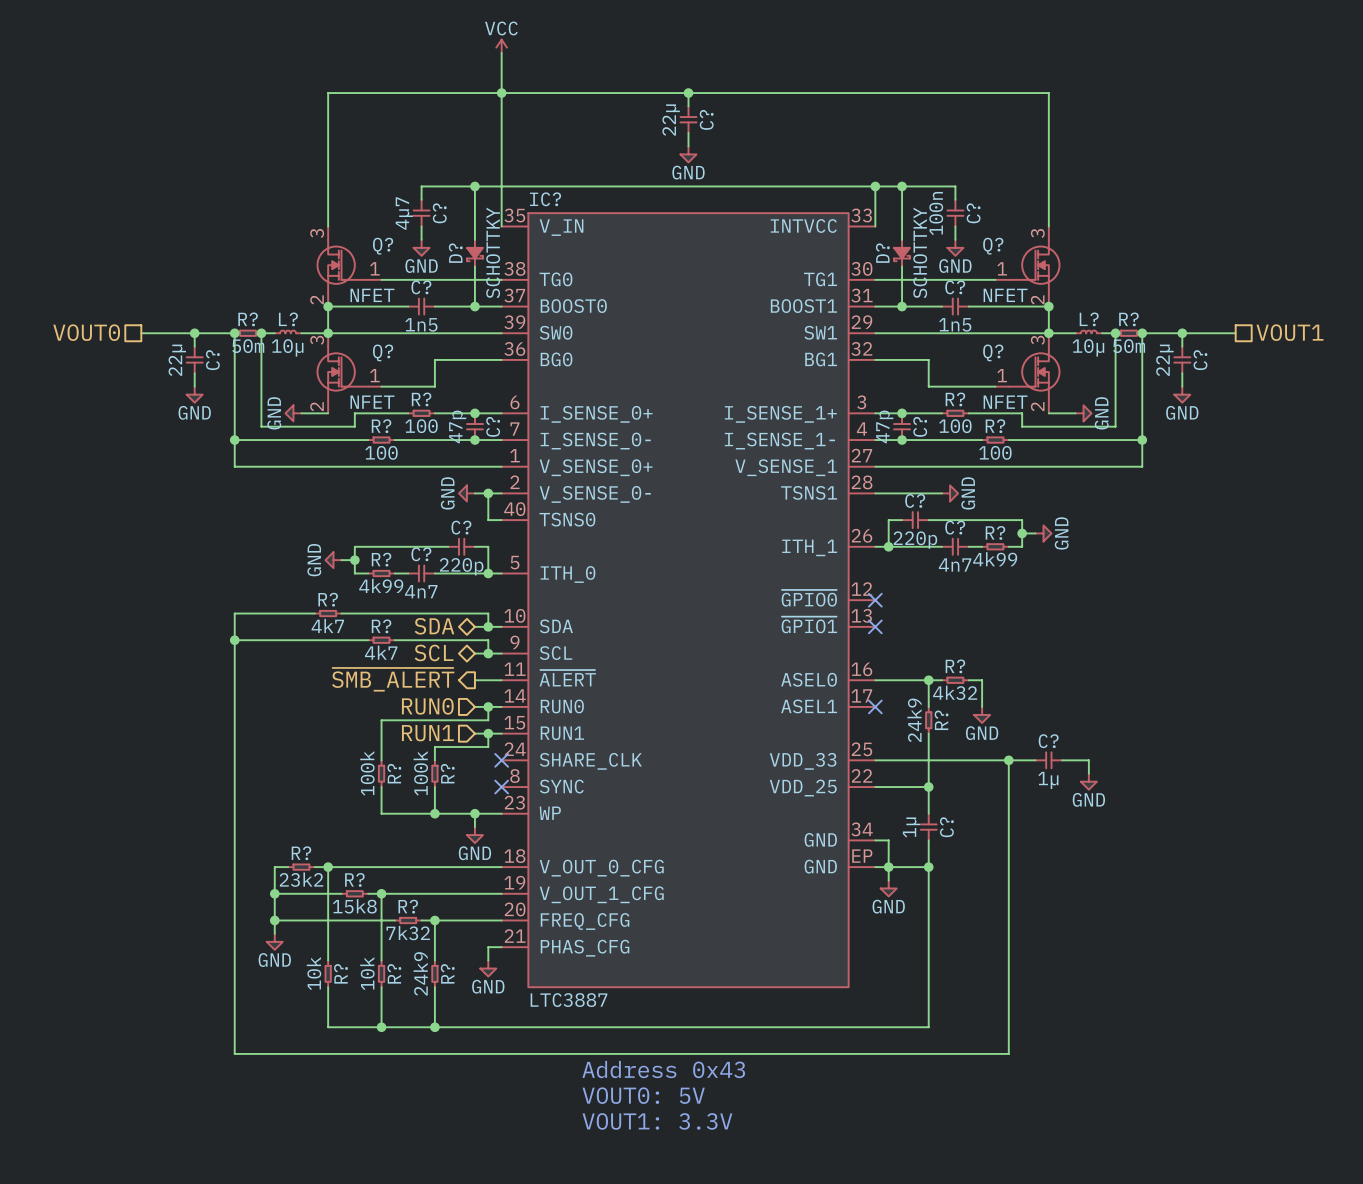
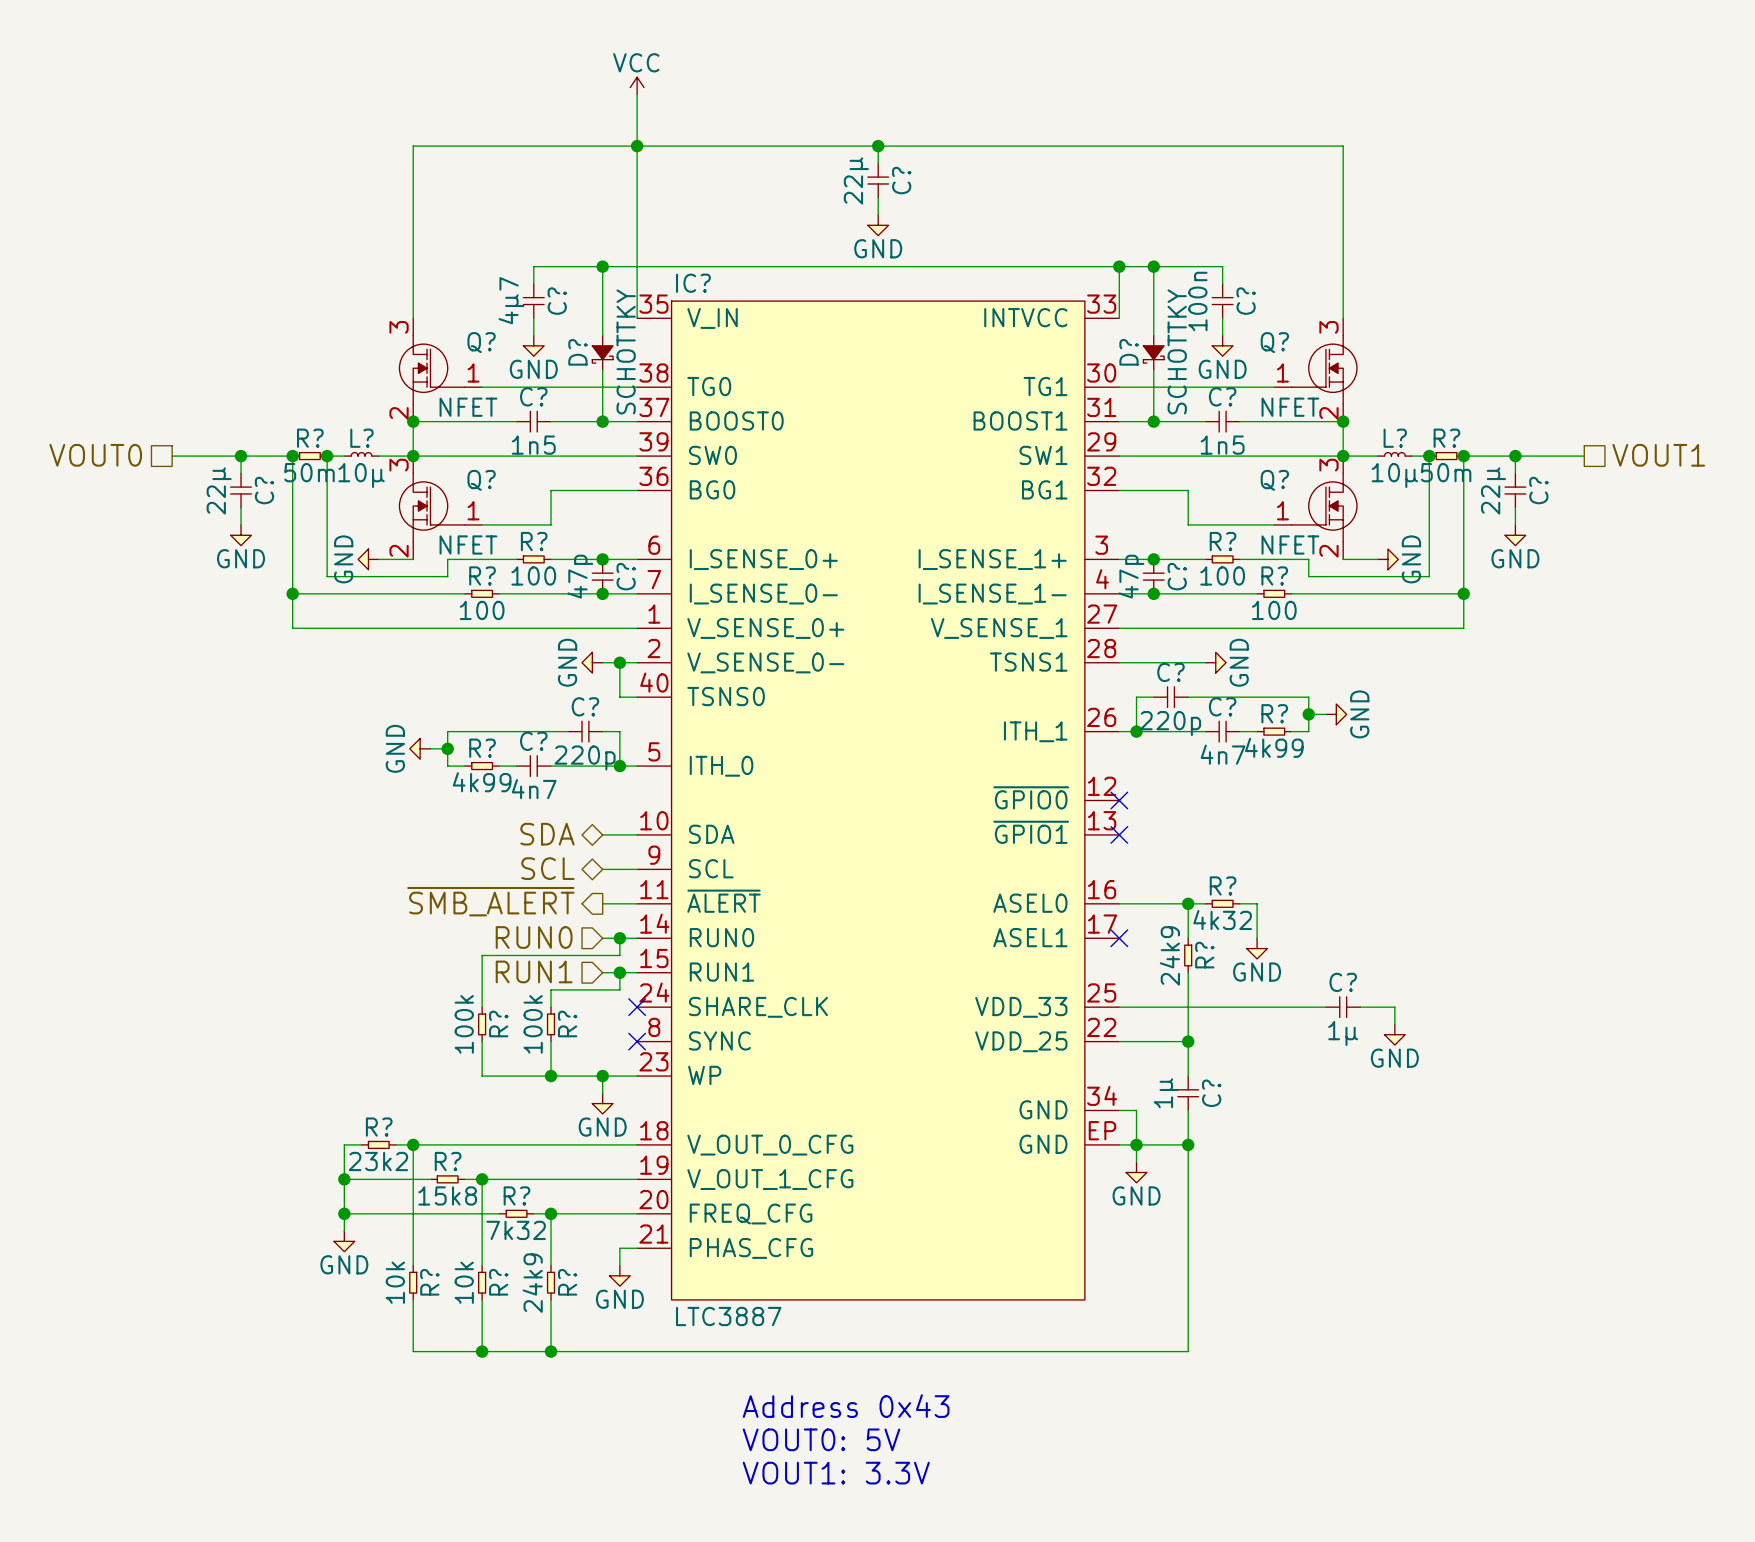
wire: (314, 613) (234, 613) (234, 1053) (1008, 1053) (1008, 760) -> none
R?: 4k7 (328, 613) -> none
wire: (341, 613) (488, 613) (488, 626) -> none
junction: (488, 626) -> none
wire: (234, 640) (368, 640) -> none
junction: (234, 640) -> none
R?: 4k7 (381, 640) -> none
wire: (394, 640) (488, 640) (488, 653) -> none
junction: (488, 653) -> none
junction: (1008, 760) -> none

